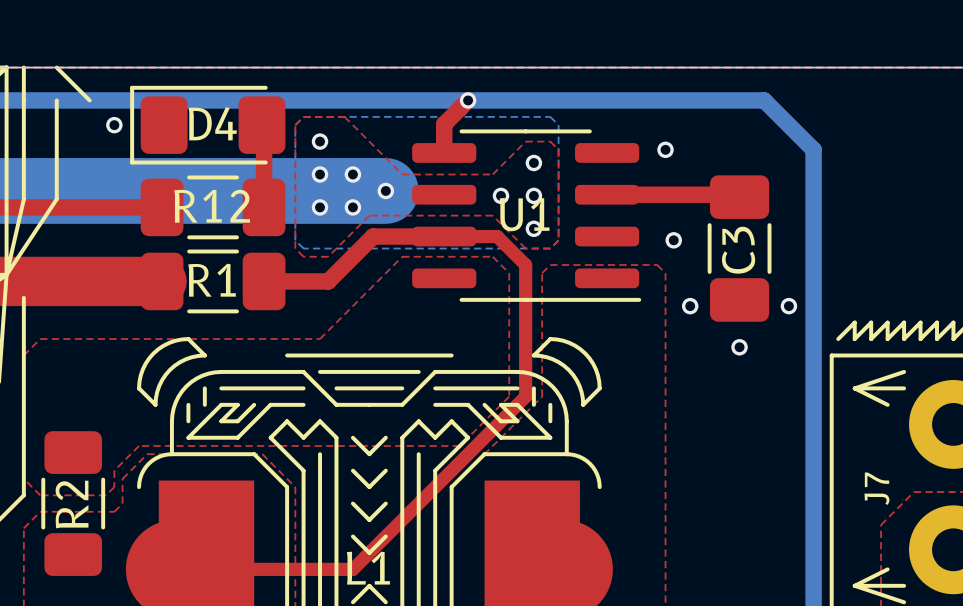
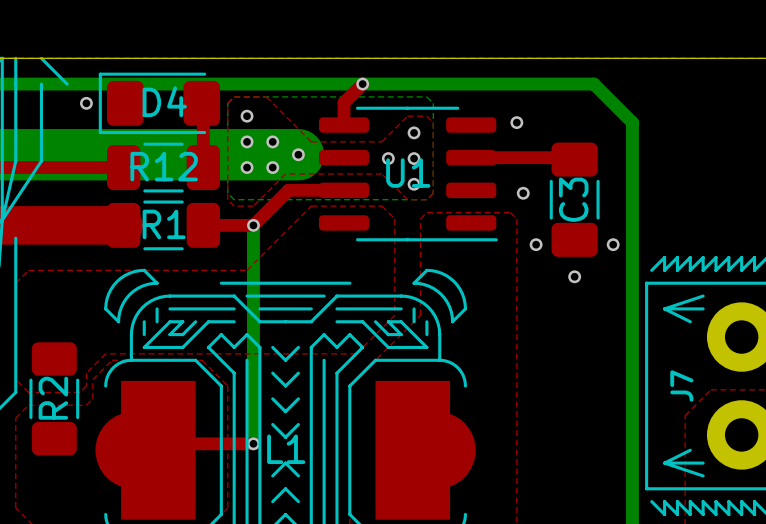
top track: (444, 236) (497, 236) (525, 264) (525, 396) (352, 569) (206, 569) -> none
bottom track: none -> (253, 225) (253, 443)
via: none -> (253, 225)
top track: none -> (164, 443) (253, 443)
via: none -> (253, 443)

